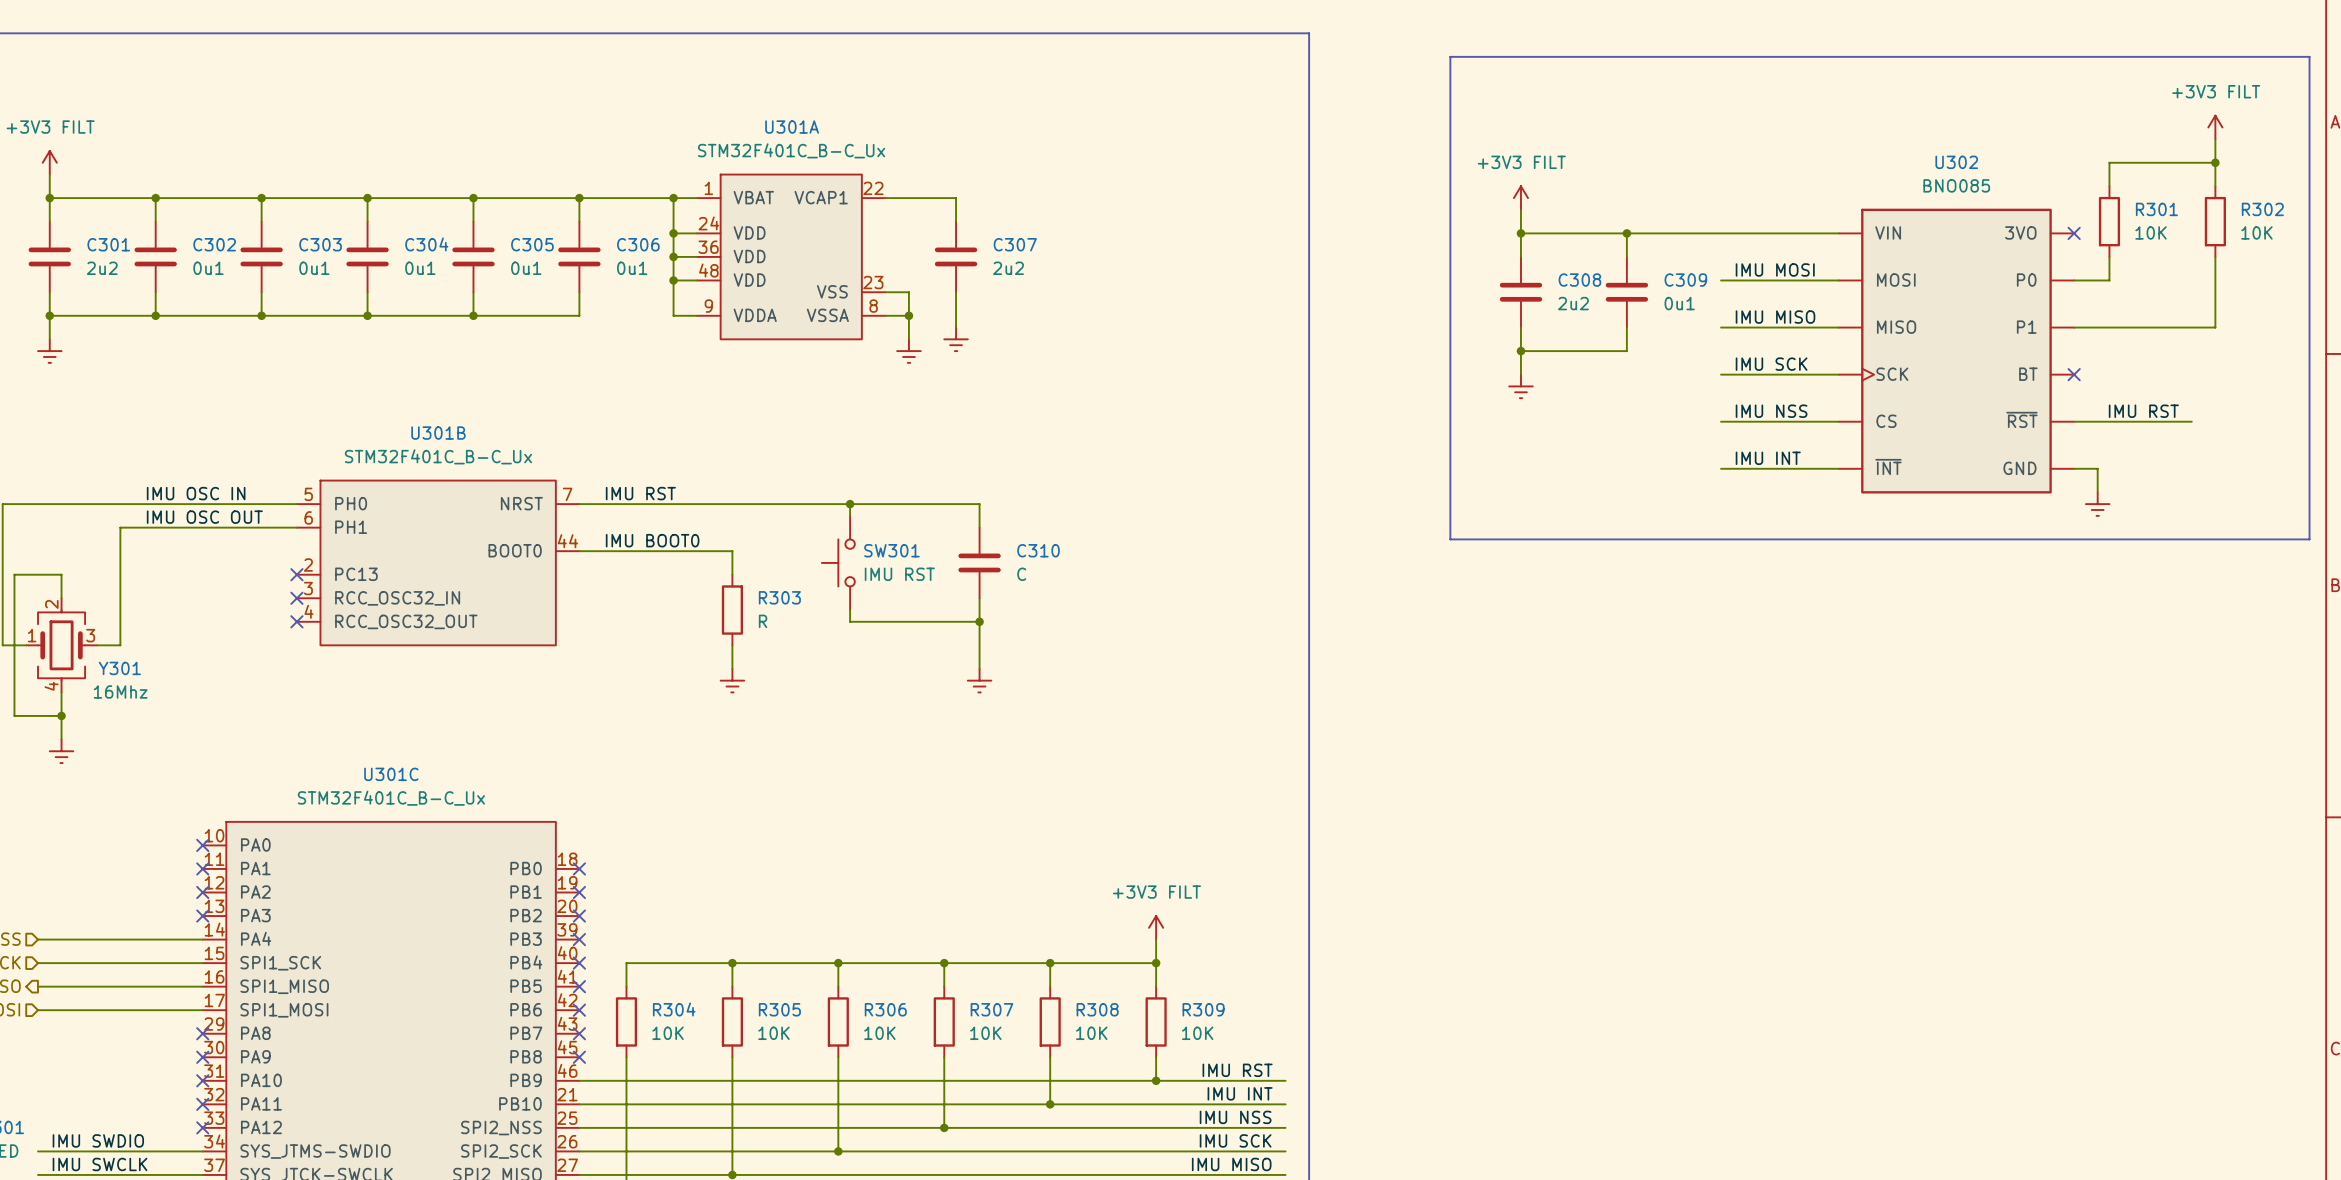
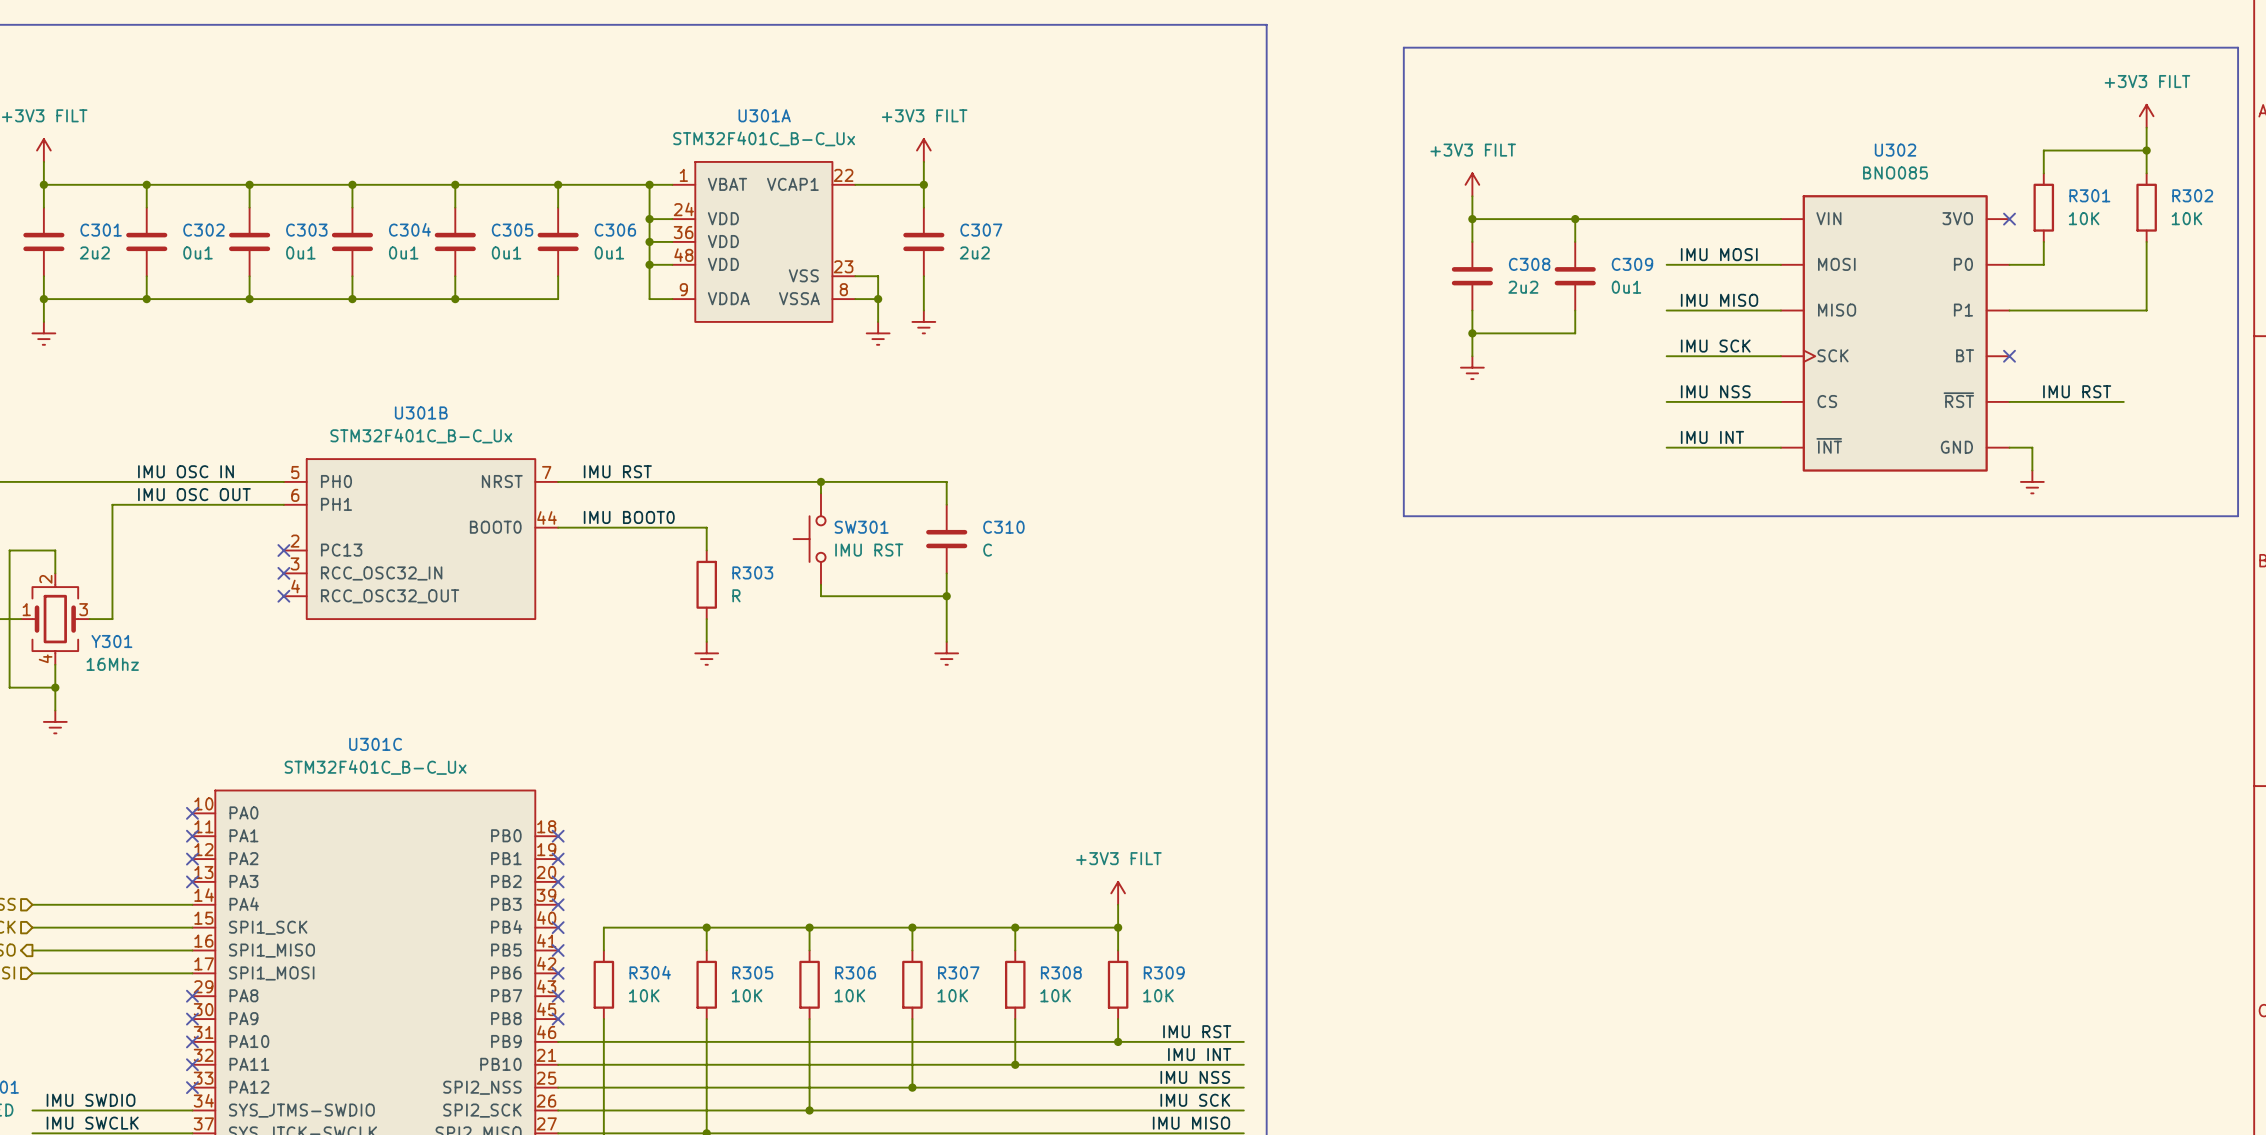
power symbol: none -> +3V3 FILT (923, 150)
wire: none -> (923, 161) (923, 184)
junction: none -> (923, 184)

